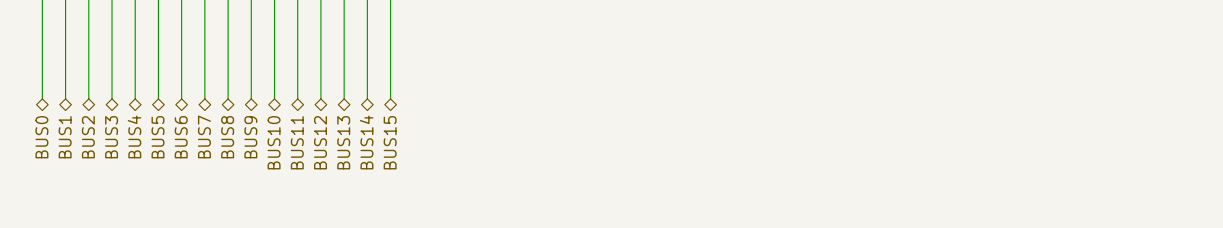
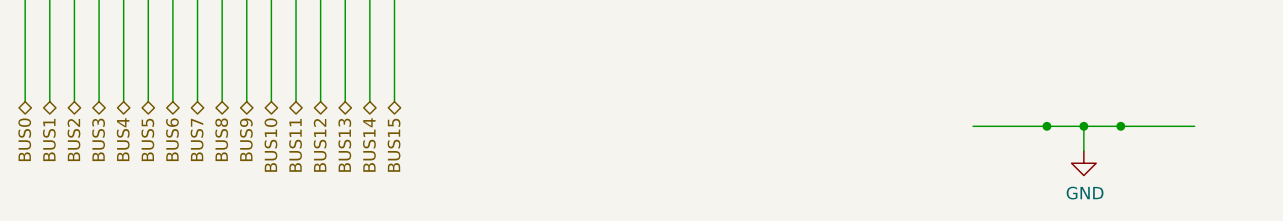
wire: none -> (973, 126) (1194, 126)
junction: none -> (1046, 126)
wire: none -> (1083, 126) (1083, 150)
junction: none -> (1083, 126)
junction: none -> (1120, 126)
power symbol: none -> GND (1083, 163)

